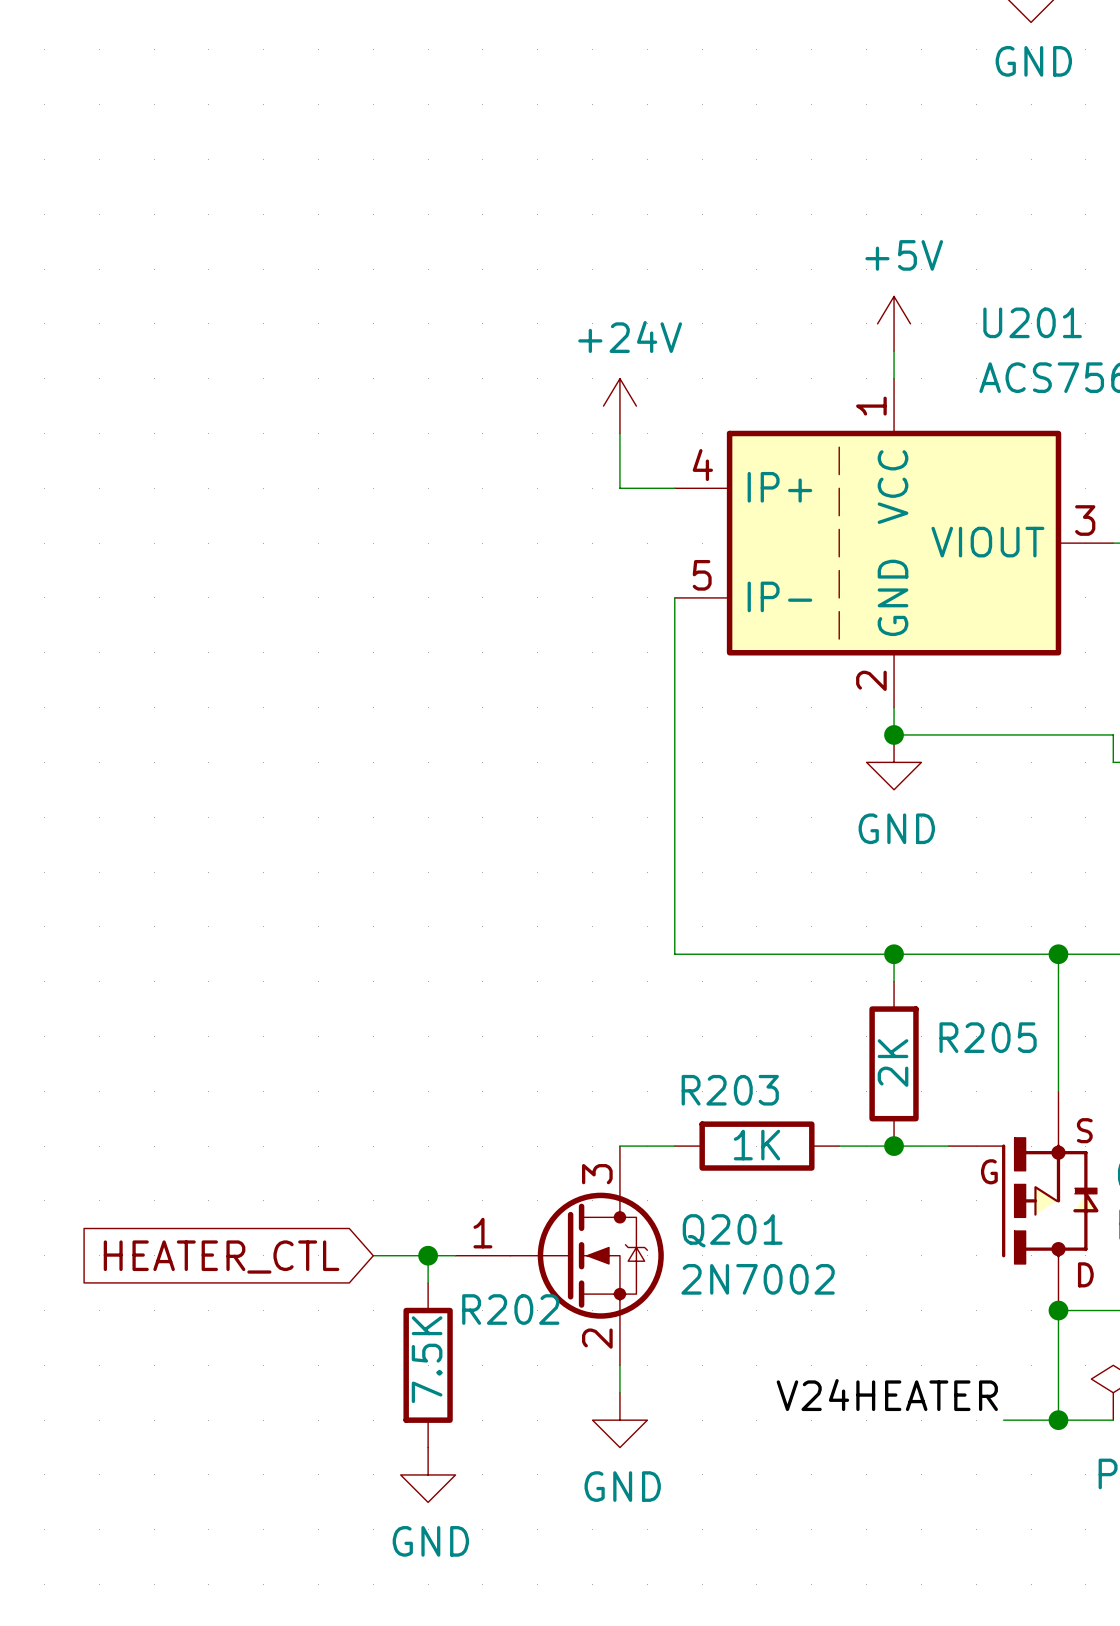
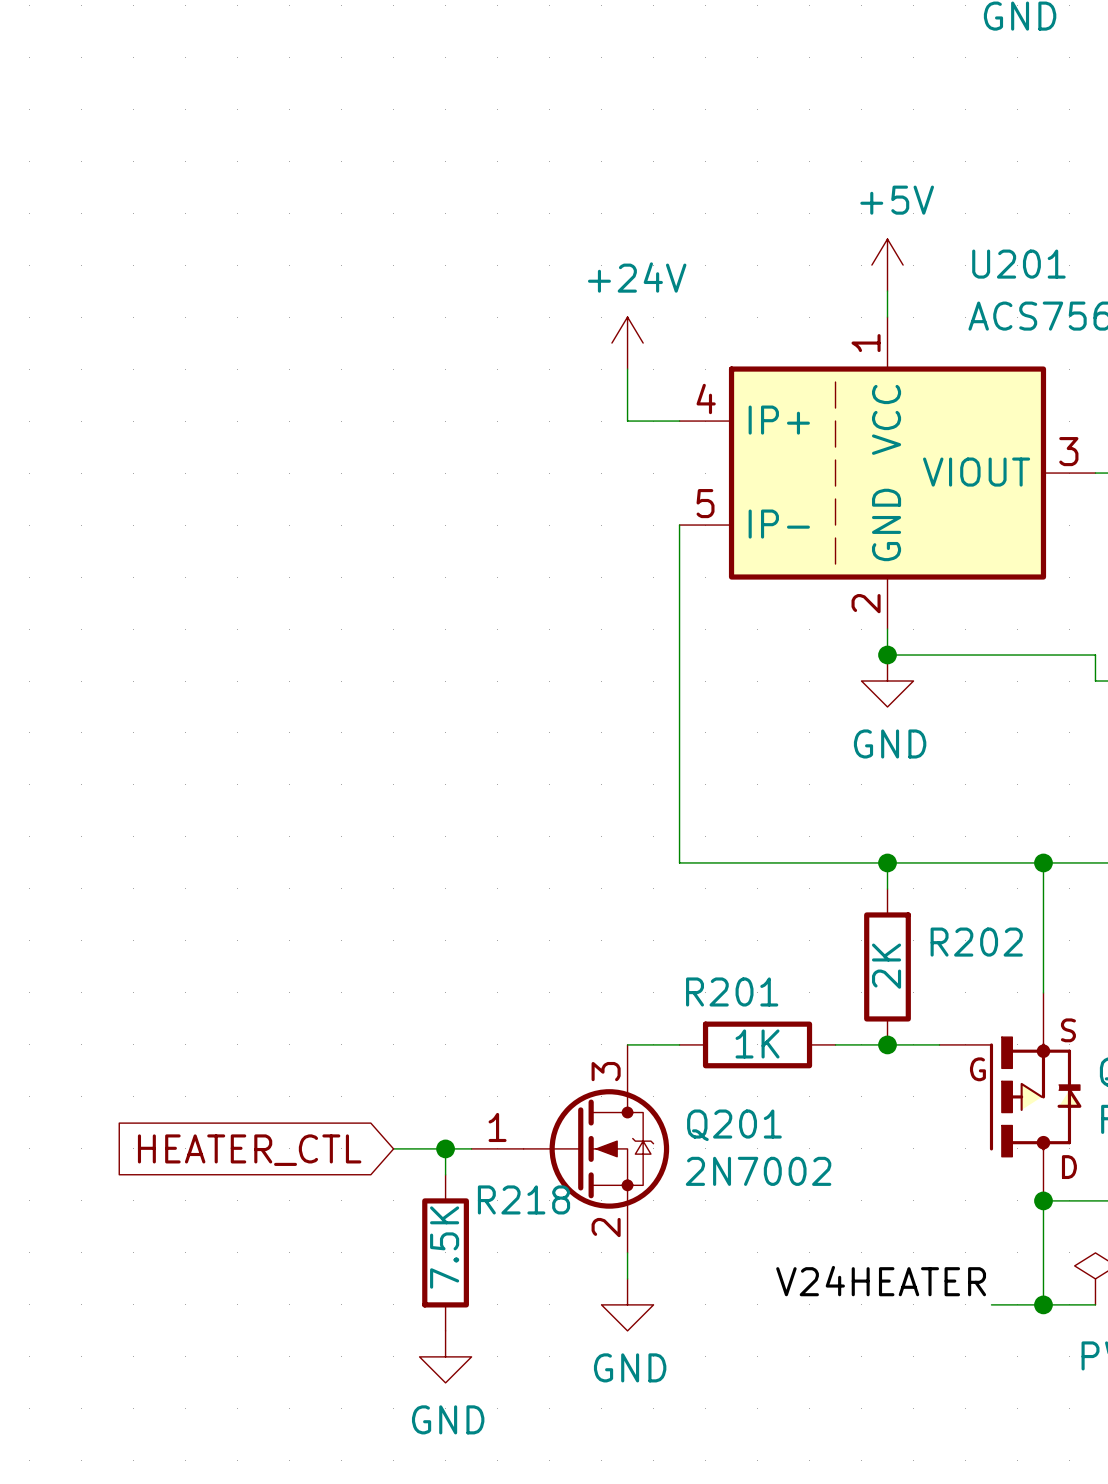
R205 name: R205 (988, 1037) -> R202 (976, 942)
R203 name: R203 (730, 1090) -> R201 (732, 991)
R202 name: R202 (510, 1309) -> R218 (523, 1199)

